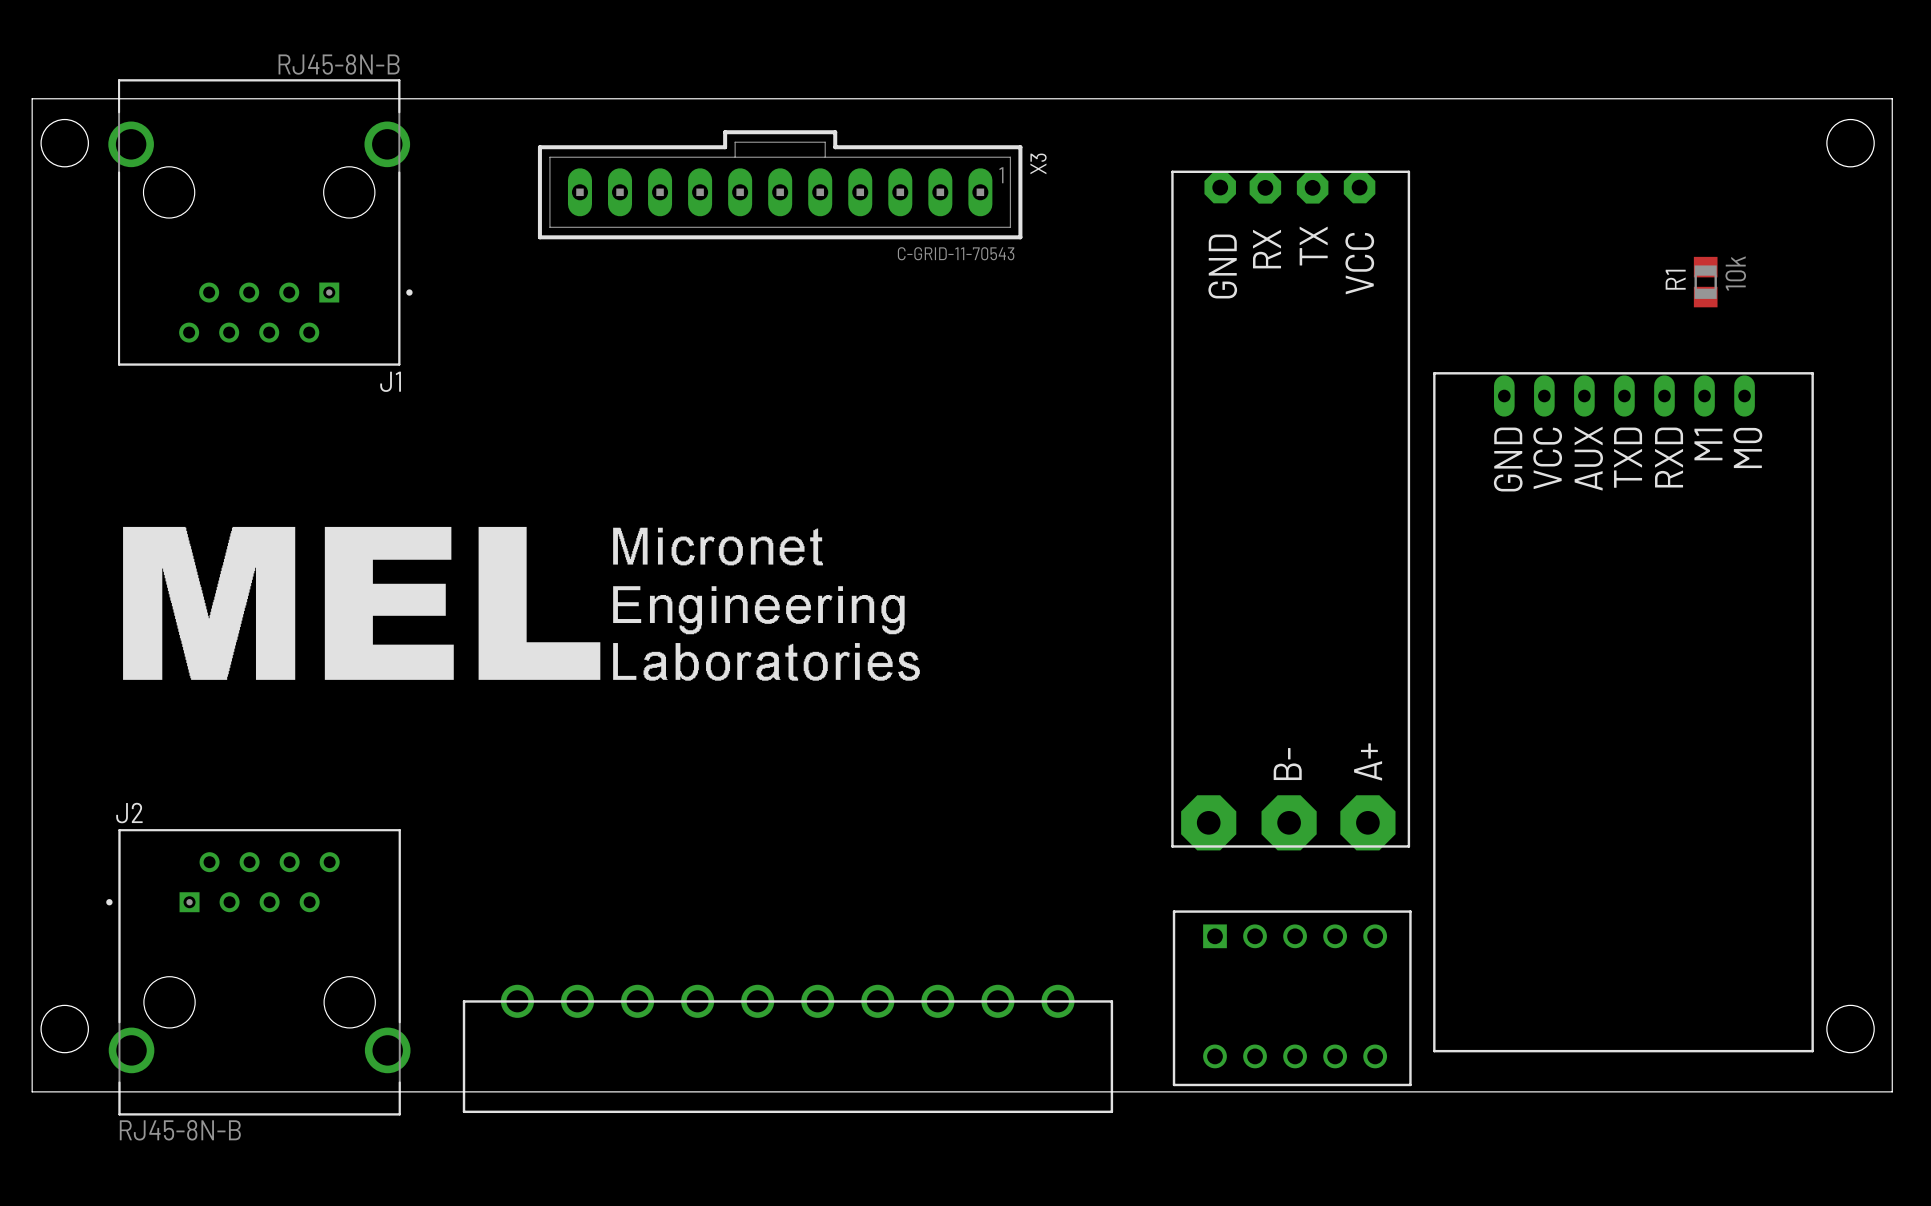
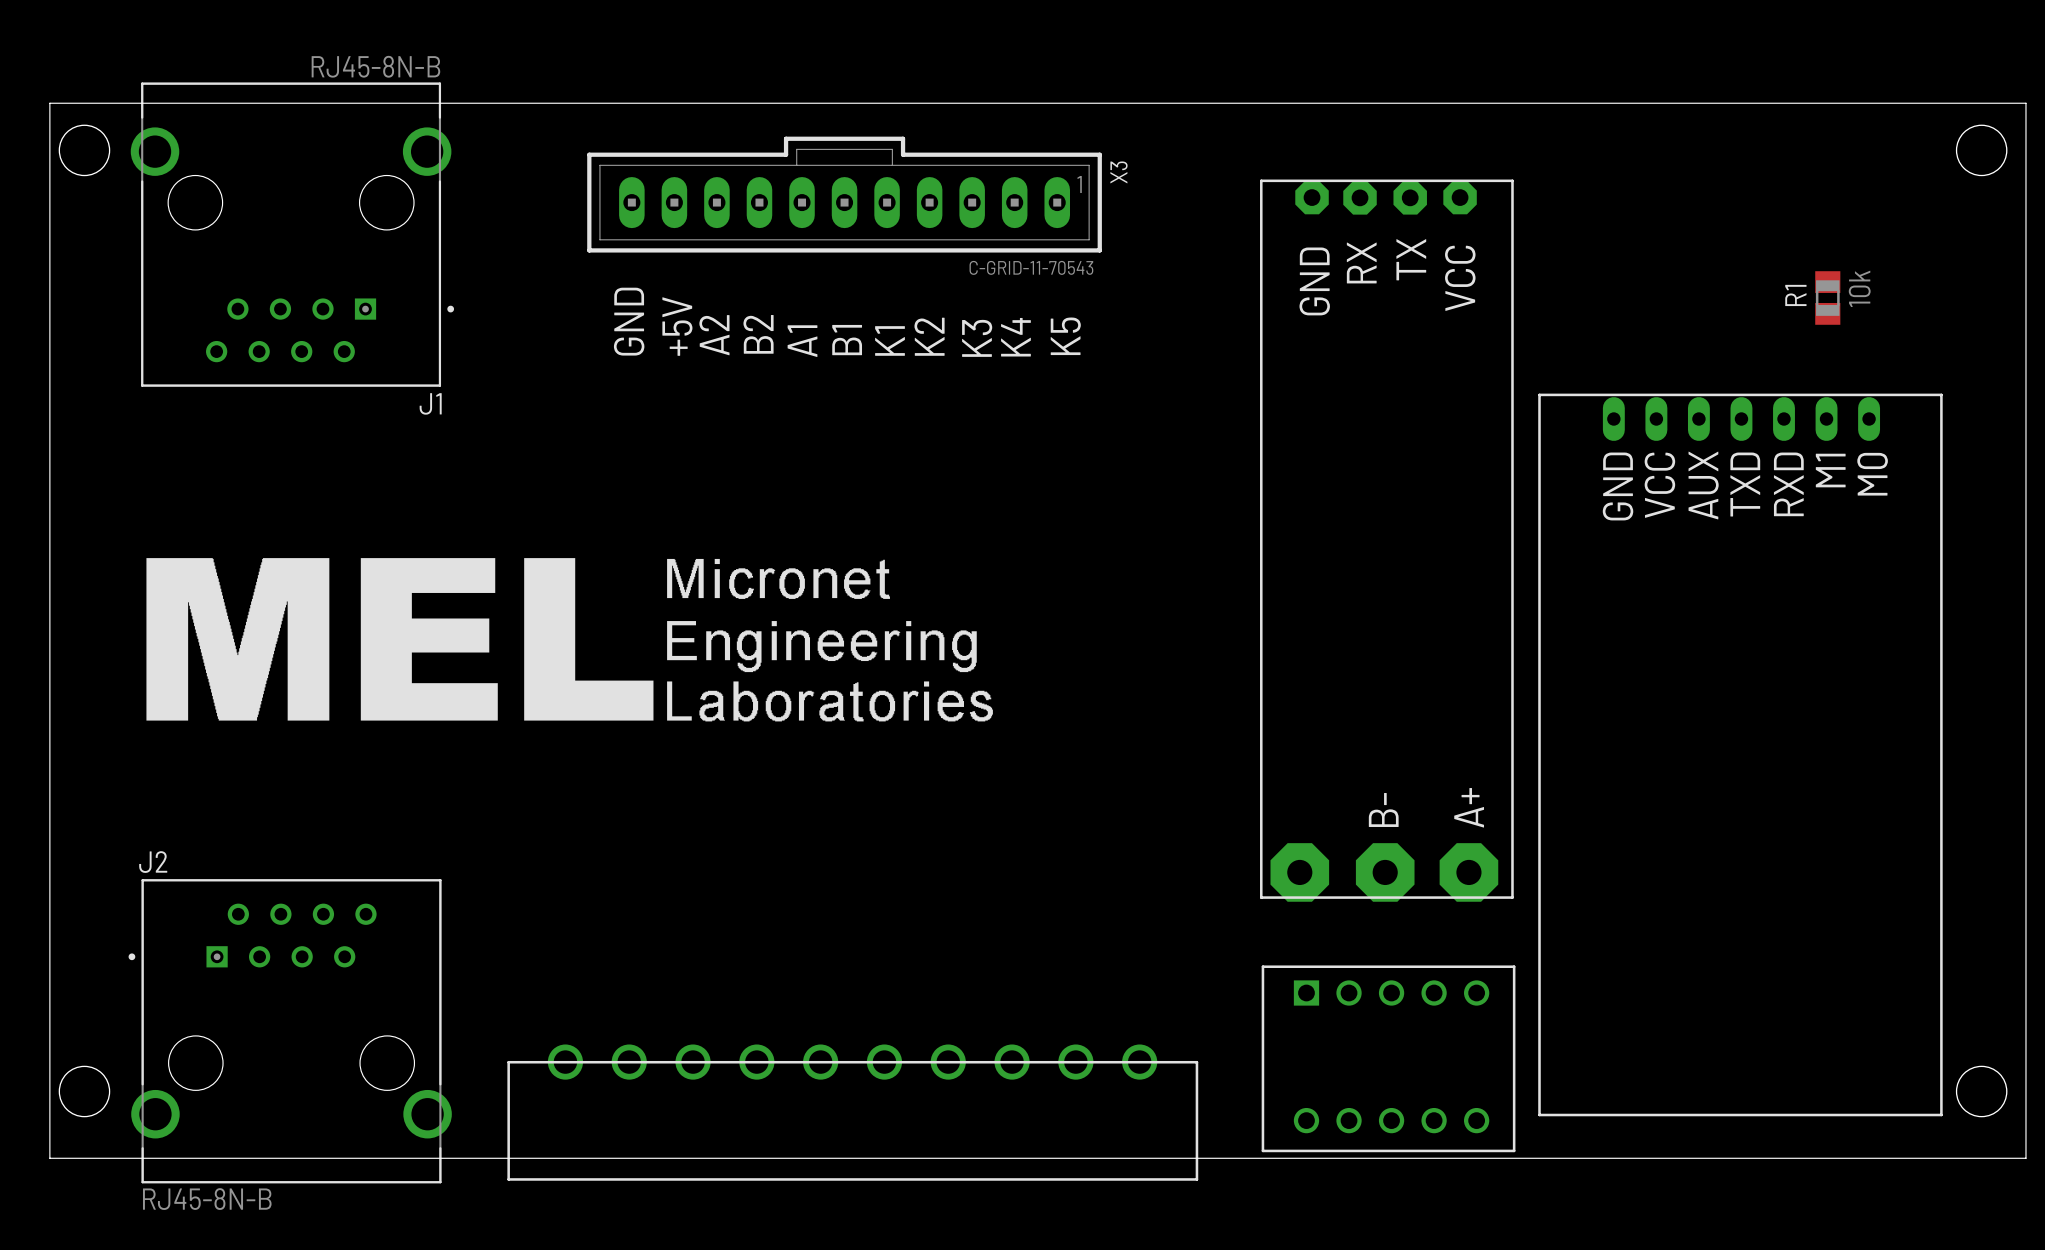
text: none -> GND (629, 321)
text: none -> +5V (677, 326)
text: none -> B2 (758, 334)
text: none -> A2 (714, 335)
text: none -> K2 (929, 336)
text: none -> K5 (1065, 336)
text: none -> K4 (1015, 337)
text: none -> K3 (977, 338)
text: none -> B1 (847, 340)
text: none -> A1 (802, 341)
text: none -> K1 (889, 340)

